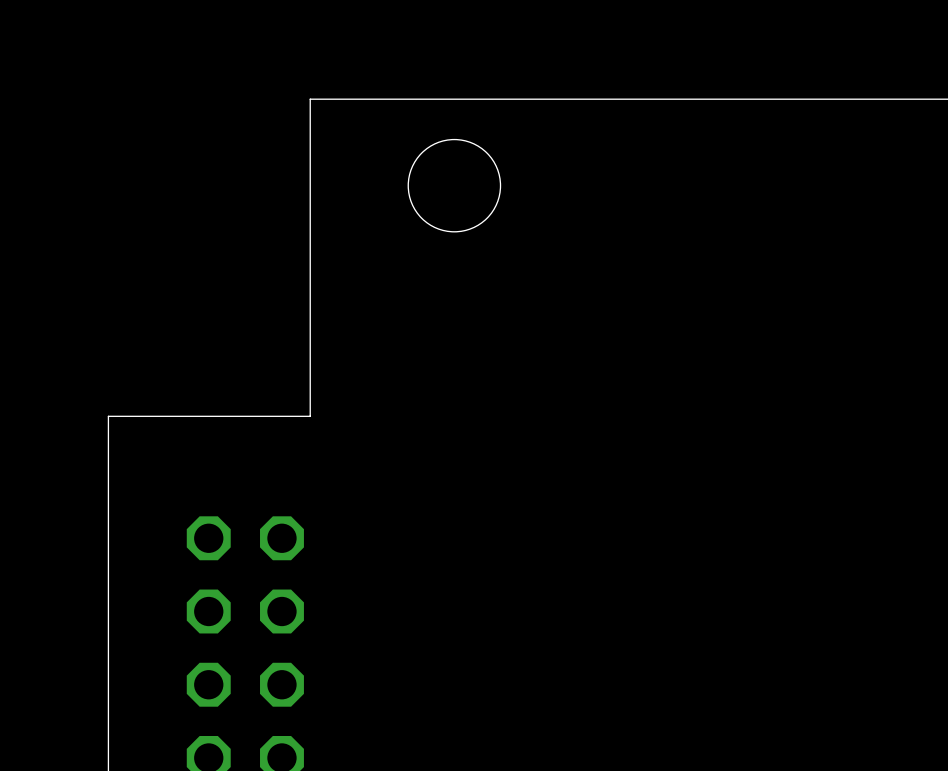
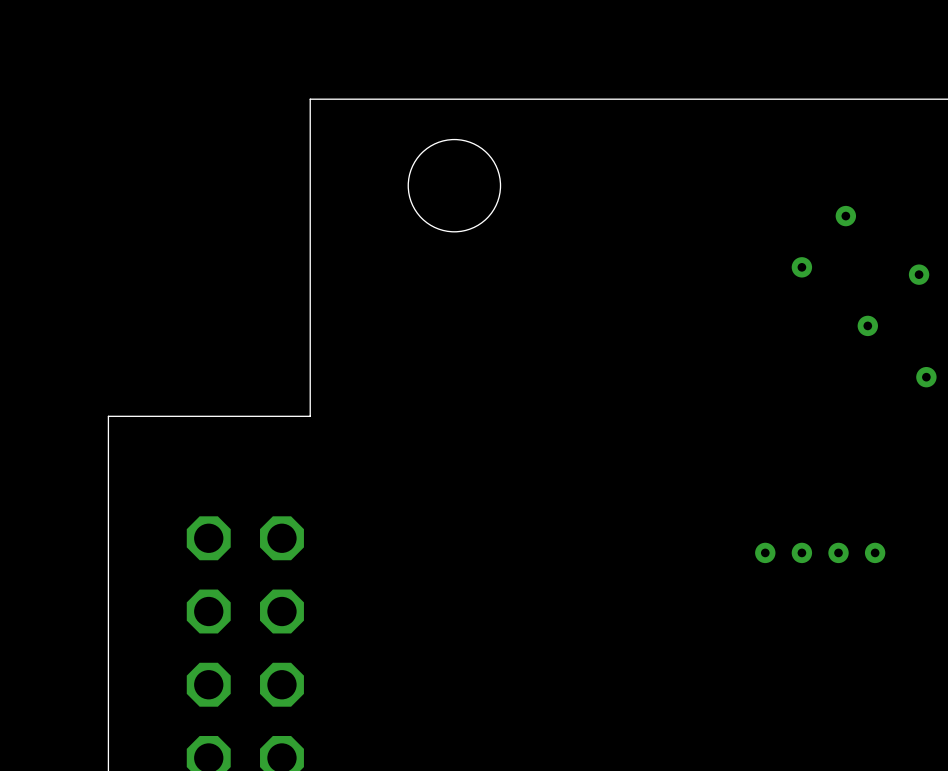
via: none -> (845, 216)
via: none -> (801, 267)
via: none -> (919, 274)
via: none -> (867, 325)
via: none -> (926, 377)
via: none -> (765, 552)
via: none -> (801, 552)
via: none -> (838, 552)
via: none -> (875, 552)

